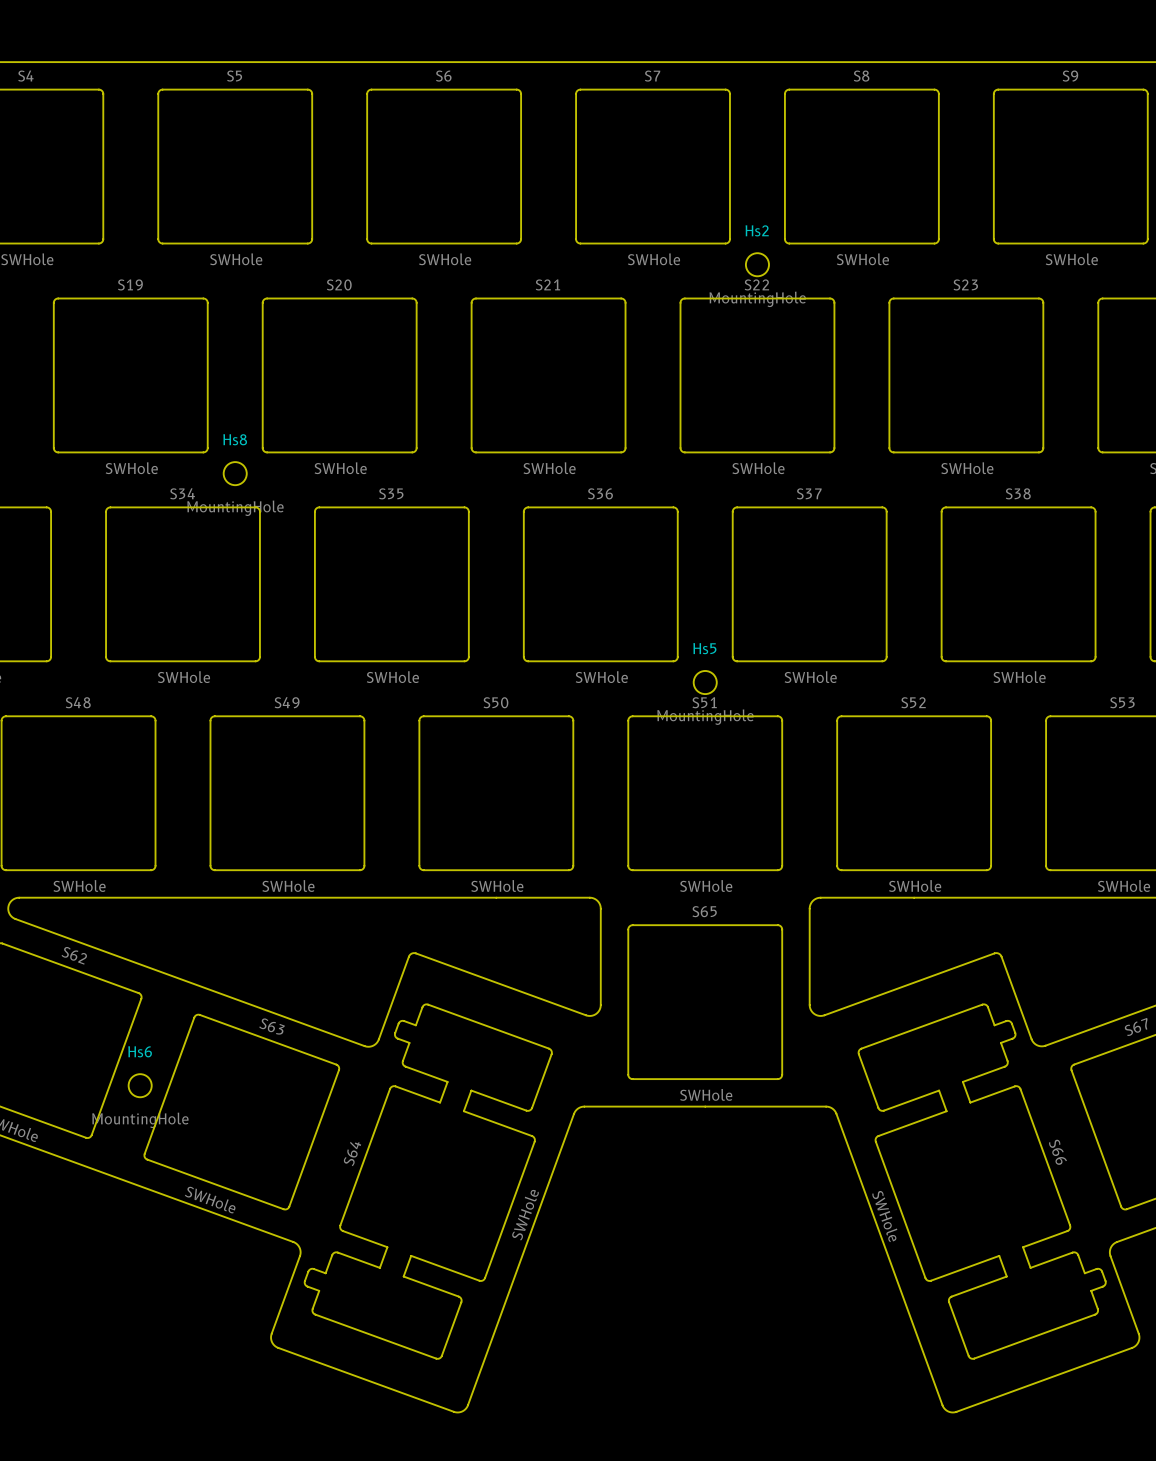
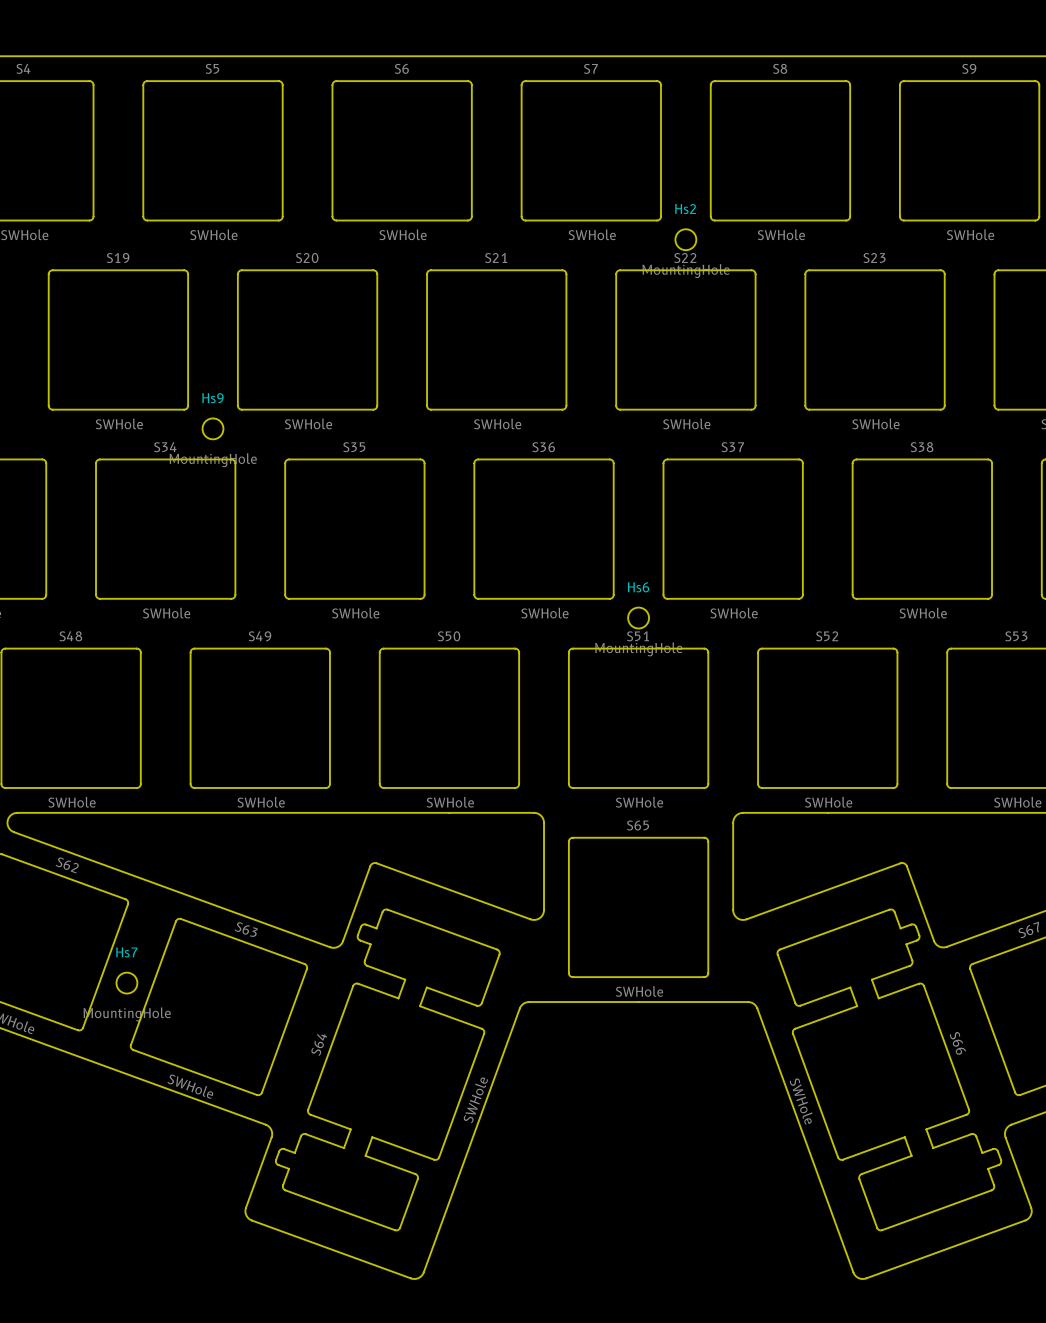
Hs8 name: Hs8 (235, 439) -> Hs9 (212, 398)
Hs5 name: Hs5 (704, 648) -> Hs6 (638, 587)
Hs6 name: Hs6 (140, 1051) -> Hs7 (126, 952)

